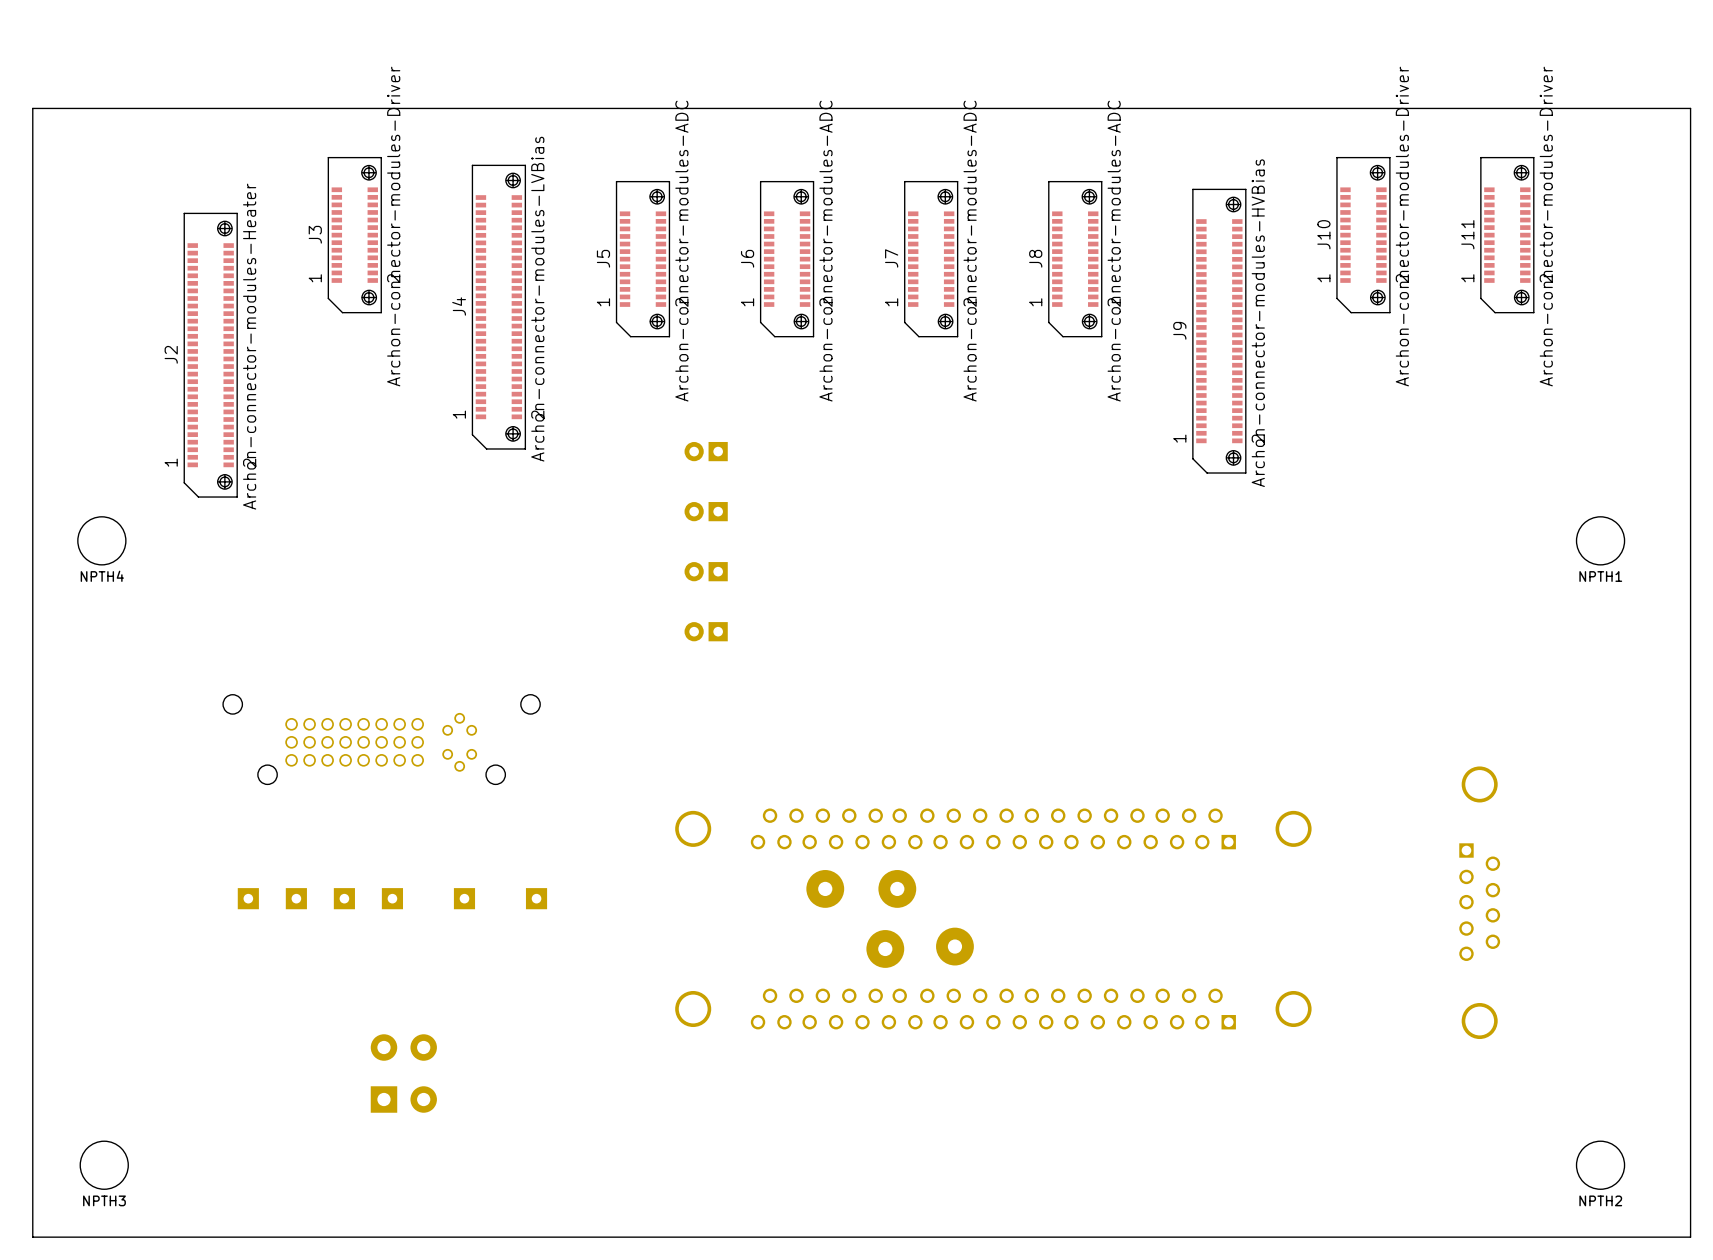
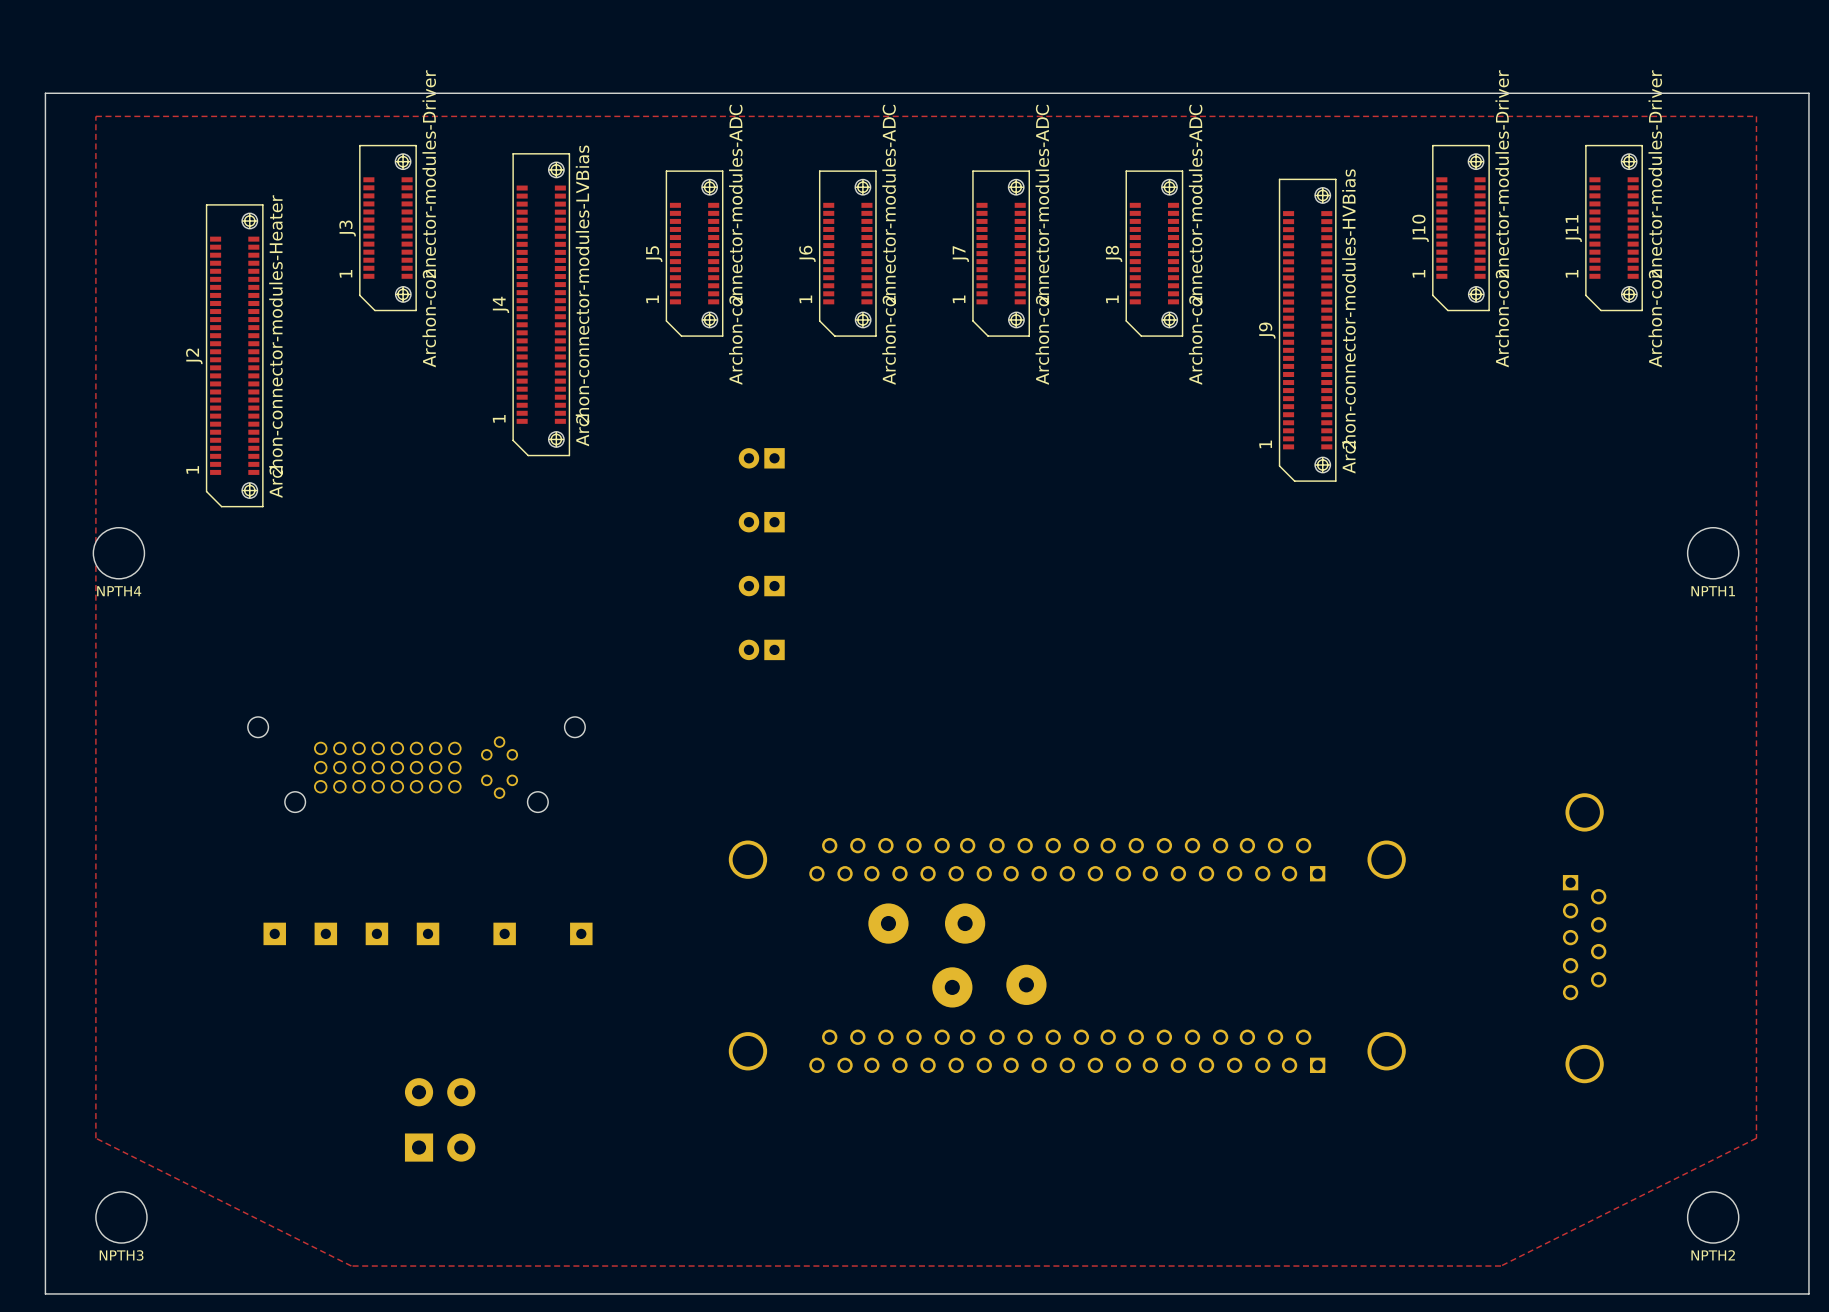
top zone outline: none -> (95, 116) (95, 1138) (351, 1266) (1500, 1266) (1756, 1138) (1756, 116) (95, 116)

